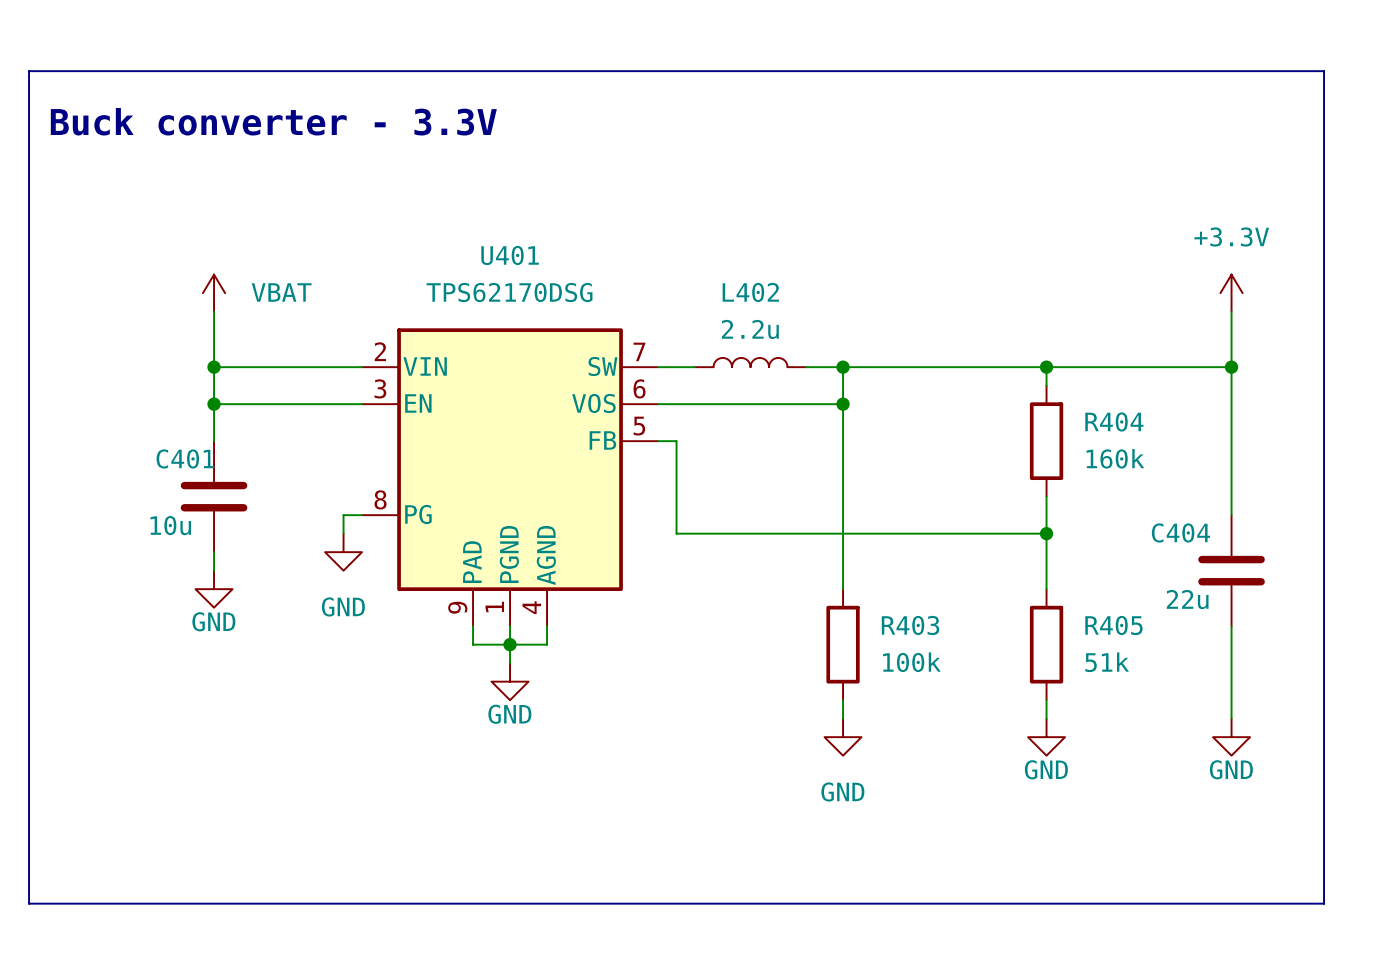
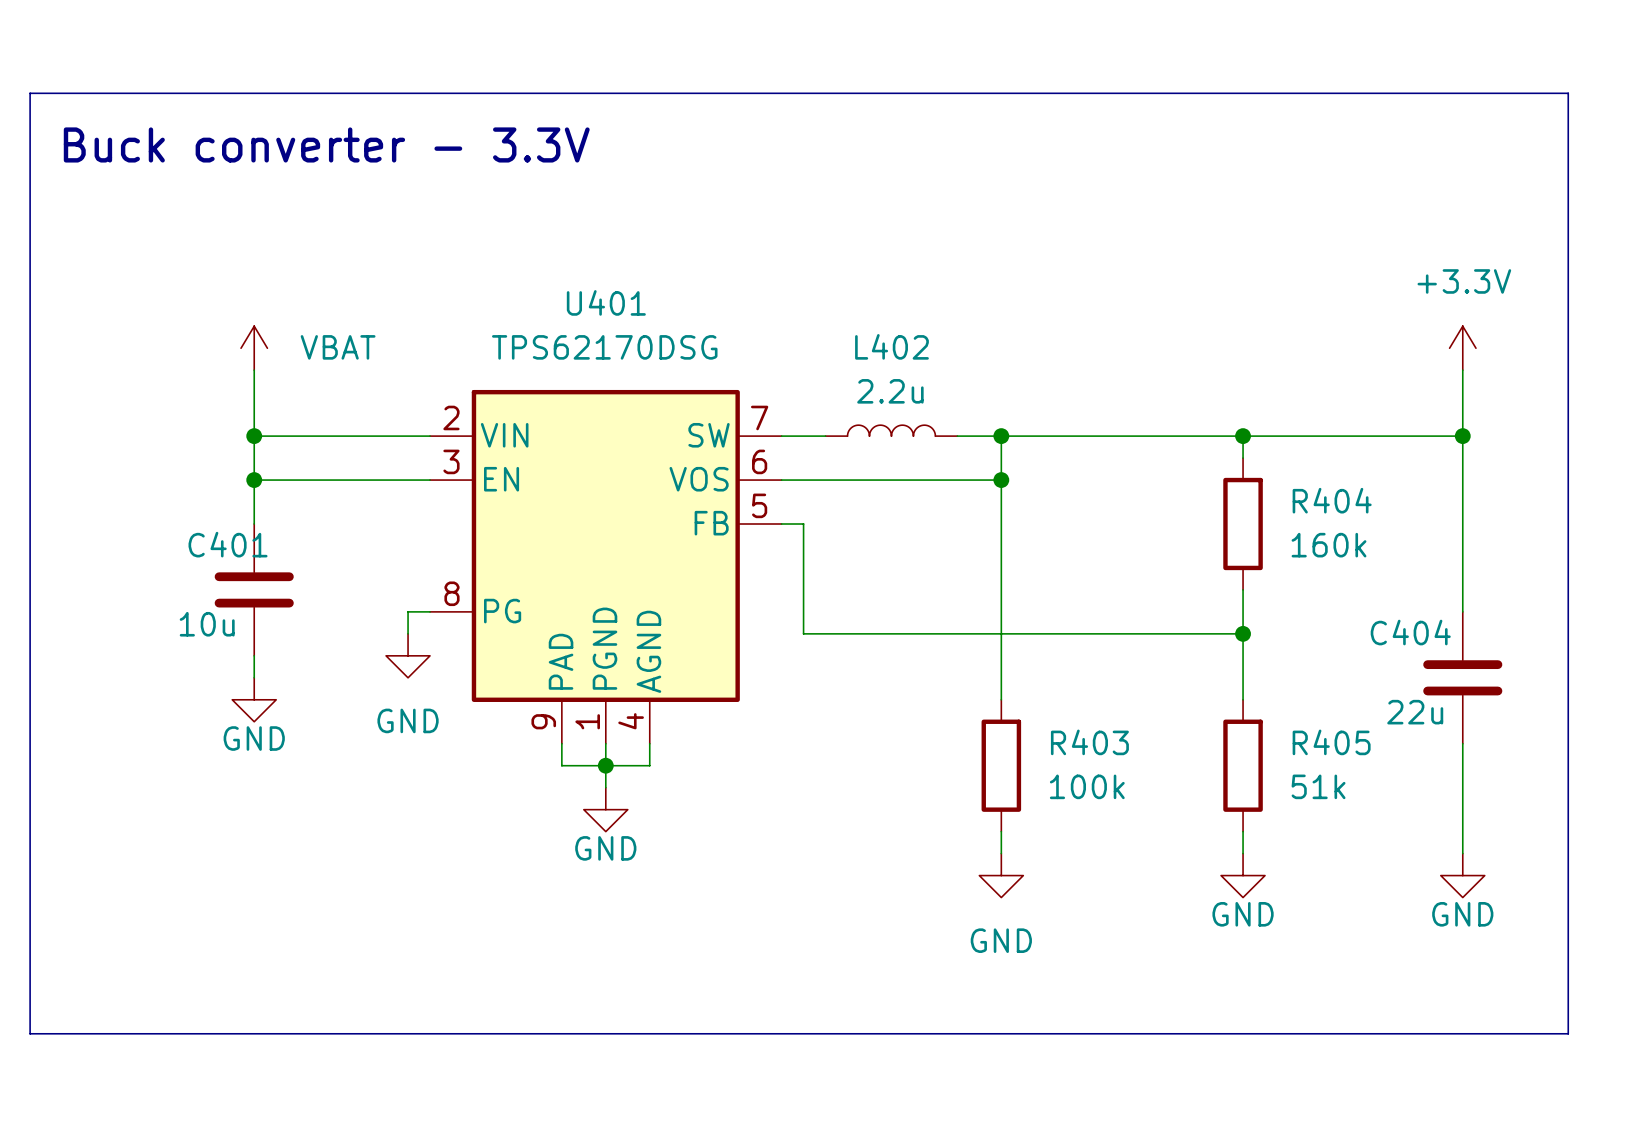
line: (29, 71) (1324, 71) (1324, 903) (29, 903) (29, 71) -> (30, 93) (30, 1033) (1568, 1033) (1568, 93) (30, 93)

